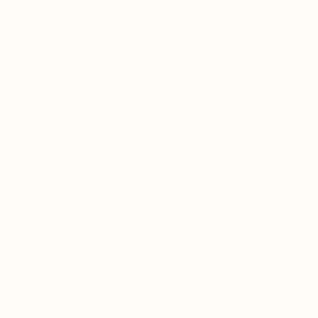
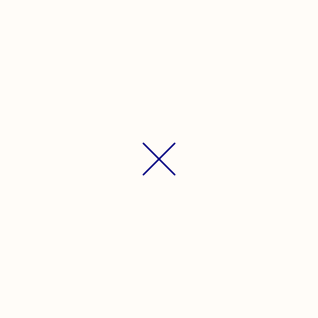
no-connect mark: none -> (159, 159)

